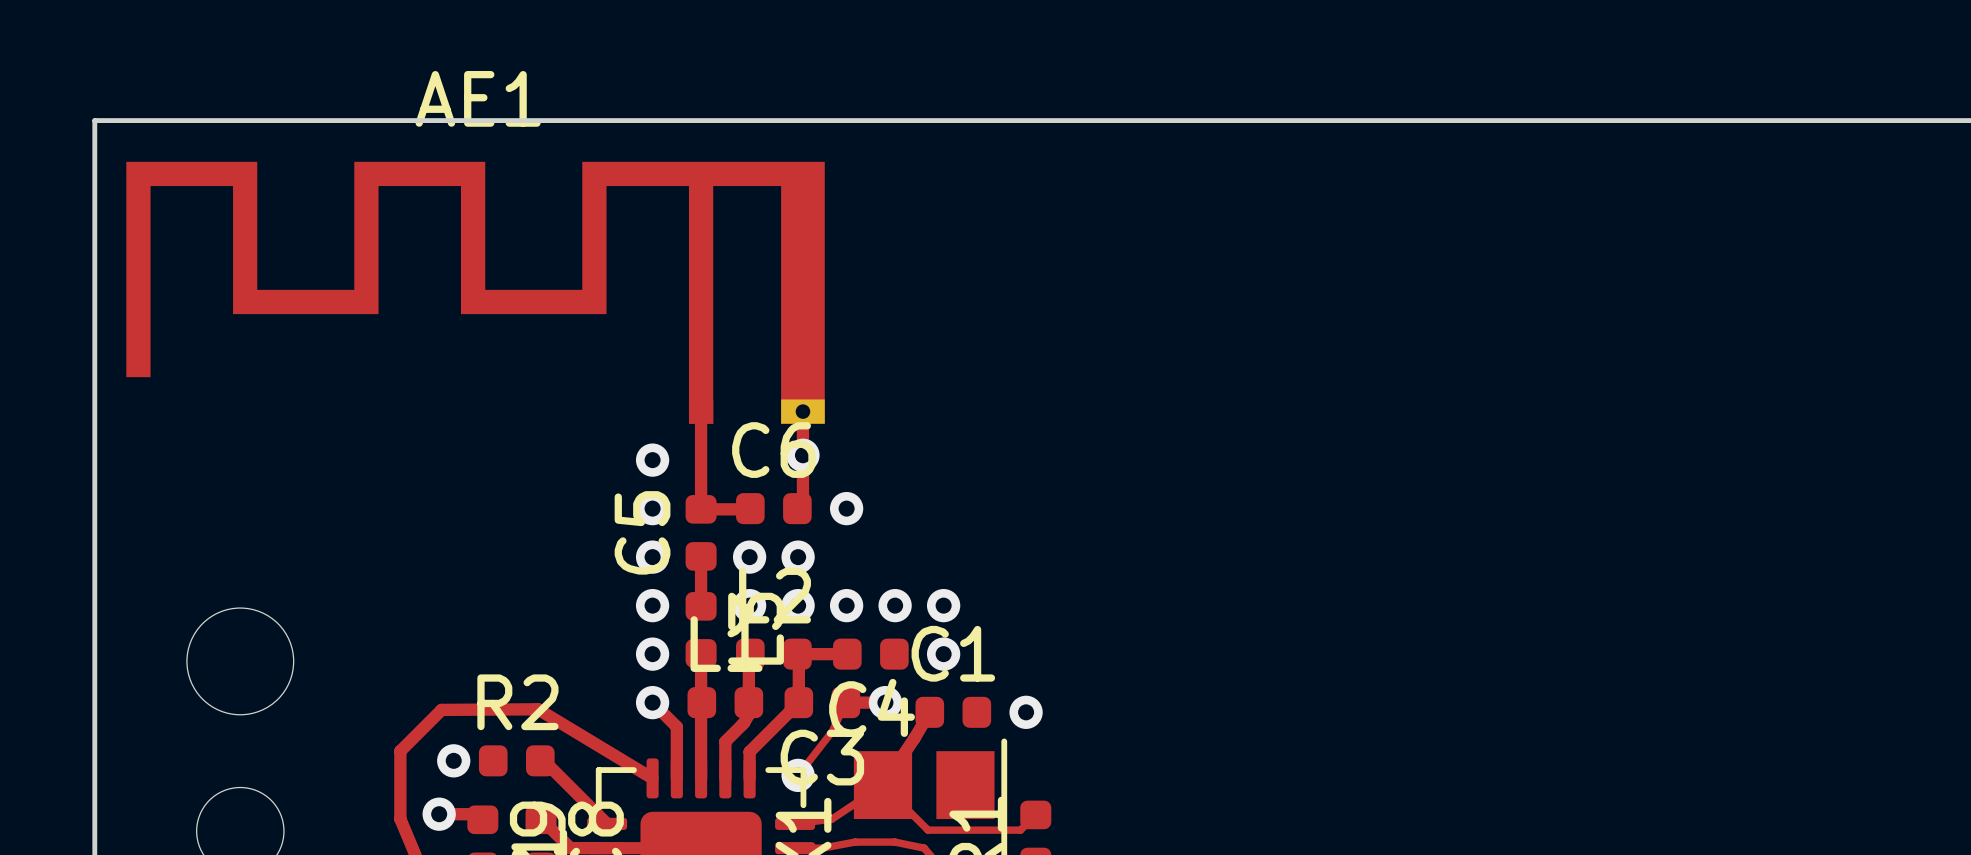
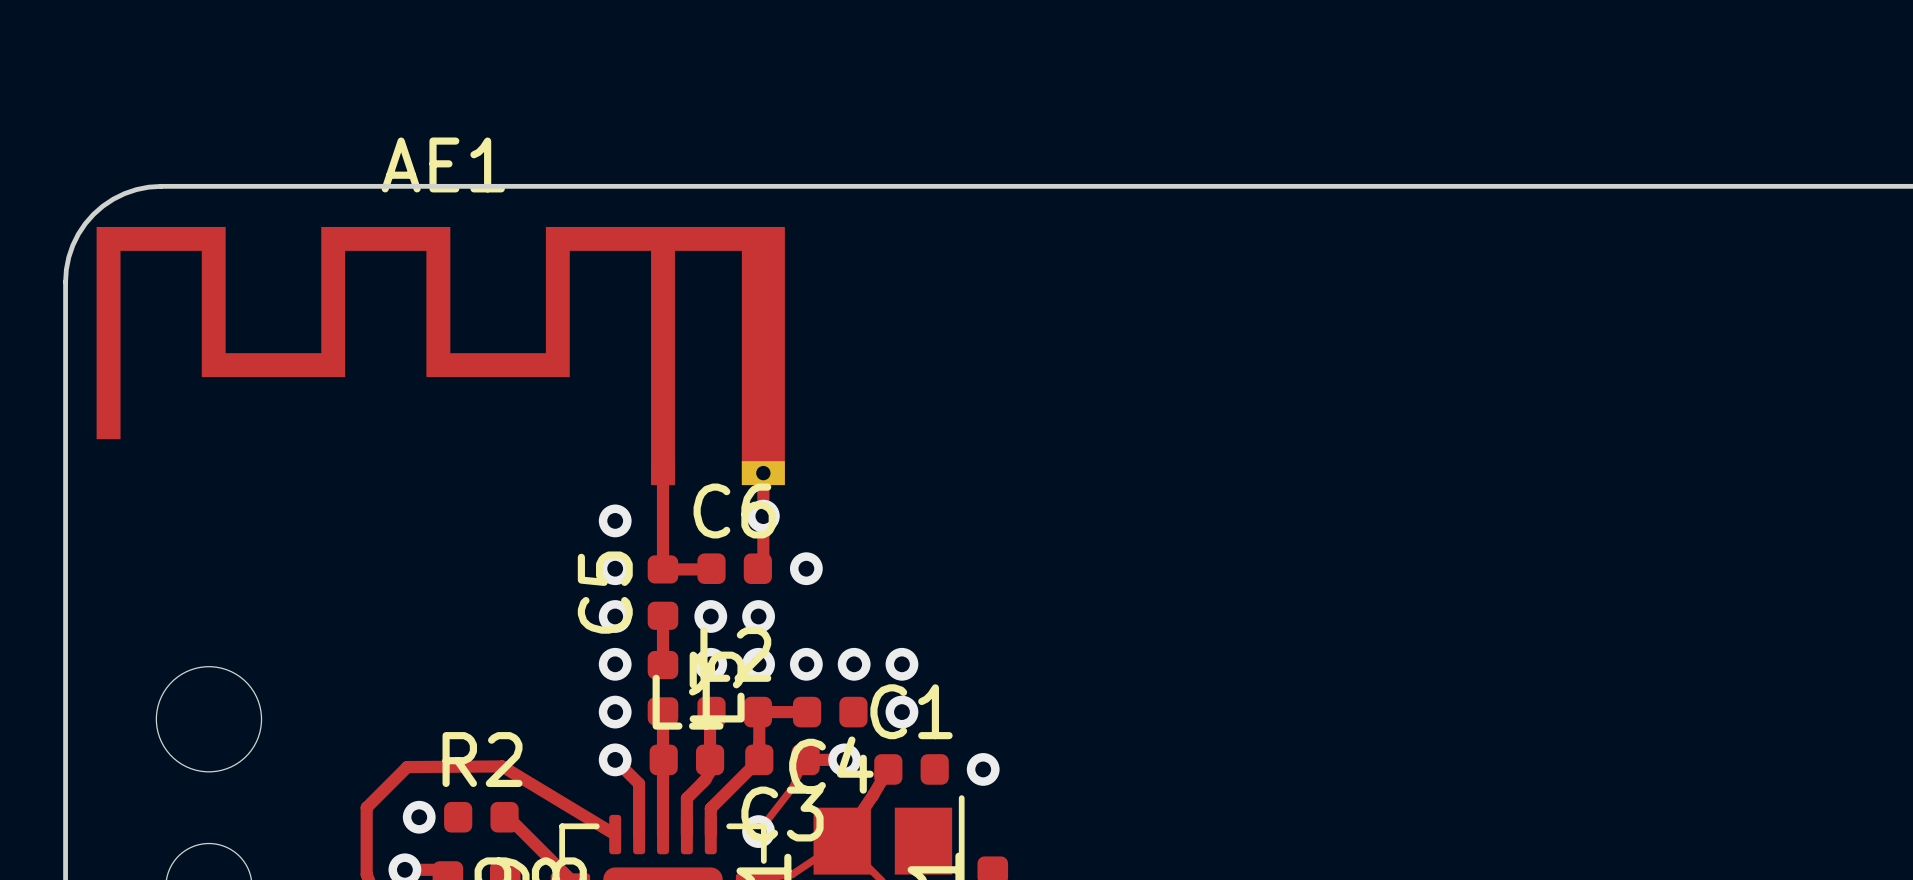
board edge: (191, 120) (94, 120) (94, 217) -> (161, 186) (136, 189) (124, 193) (113, 199) (93, 214) (85, 223) (72, 245) (68, 257) (65, 281)

